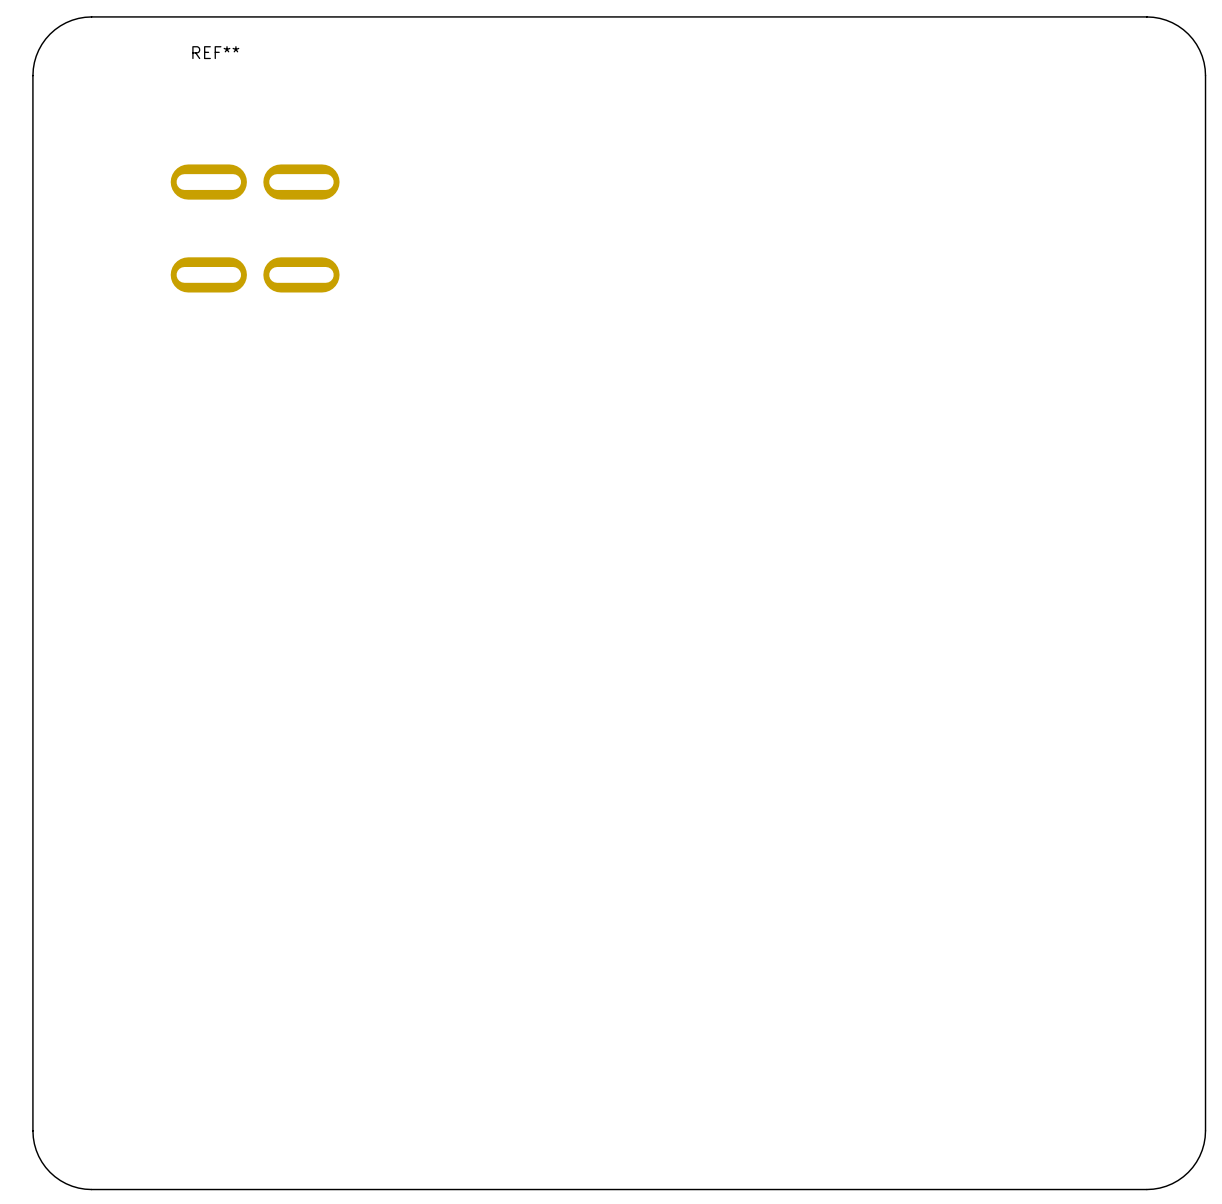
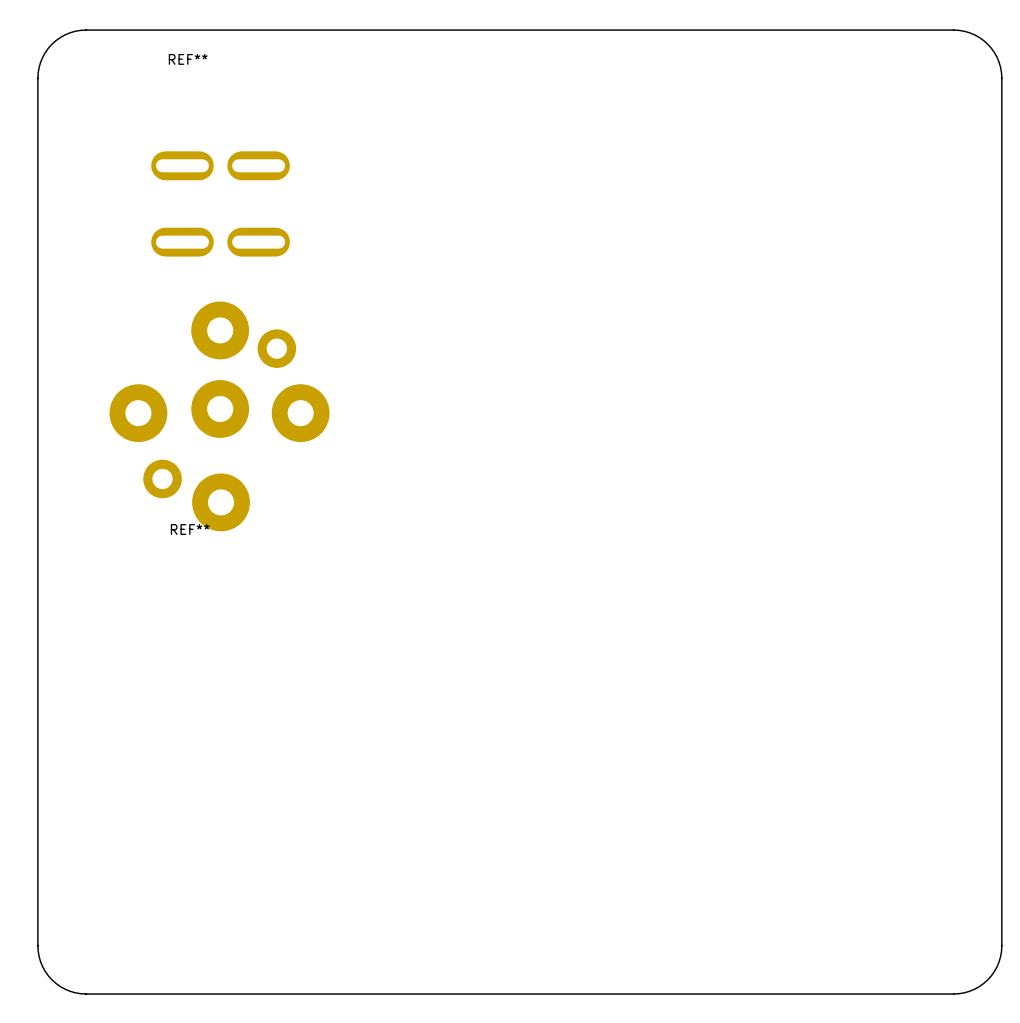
REF**: none -> (219, 416)

